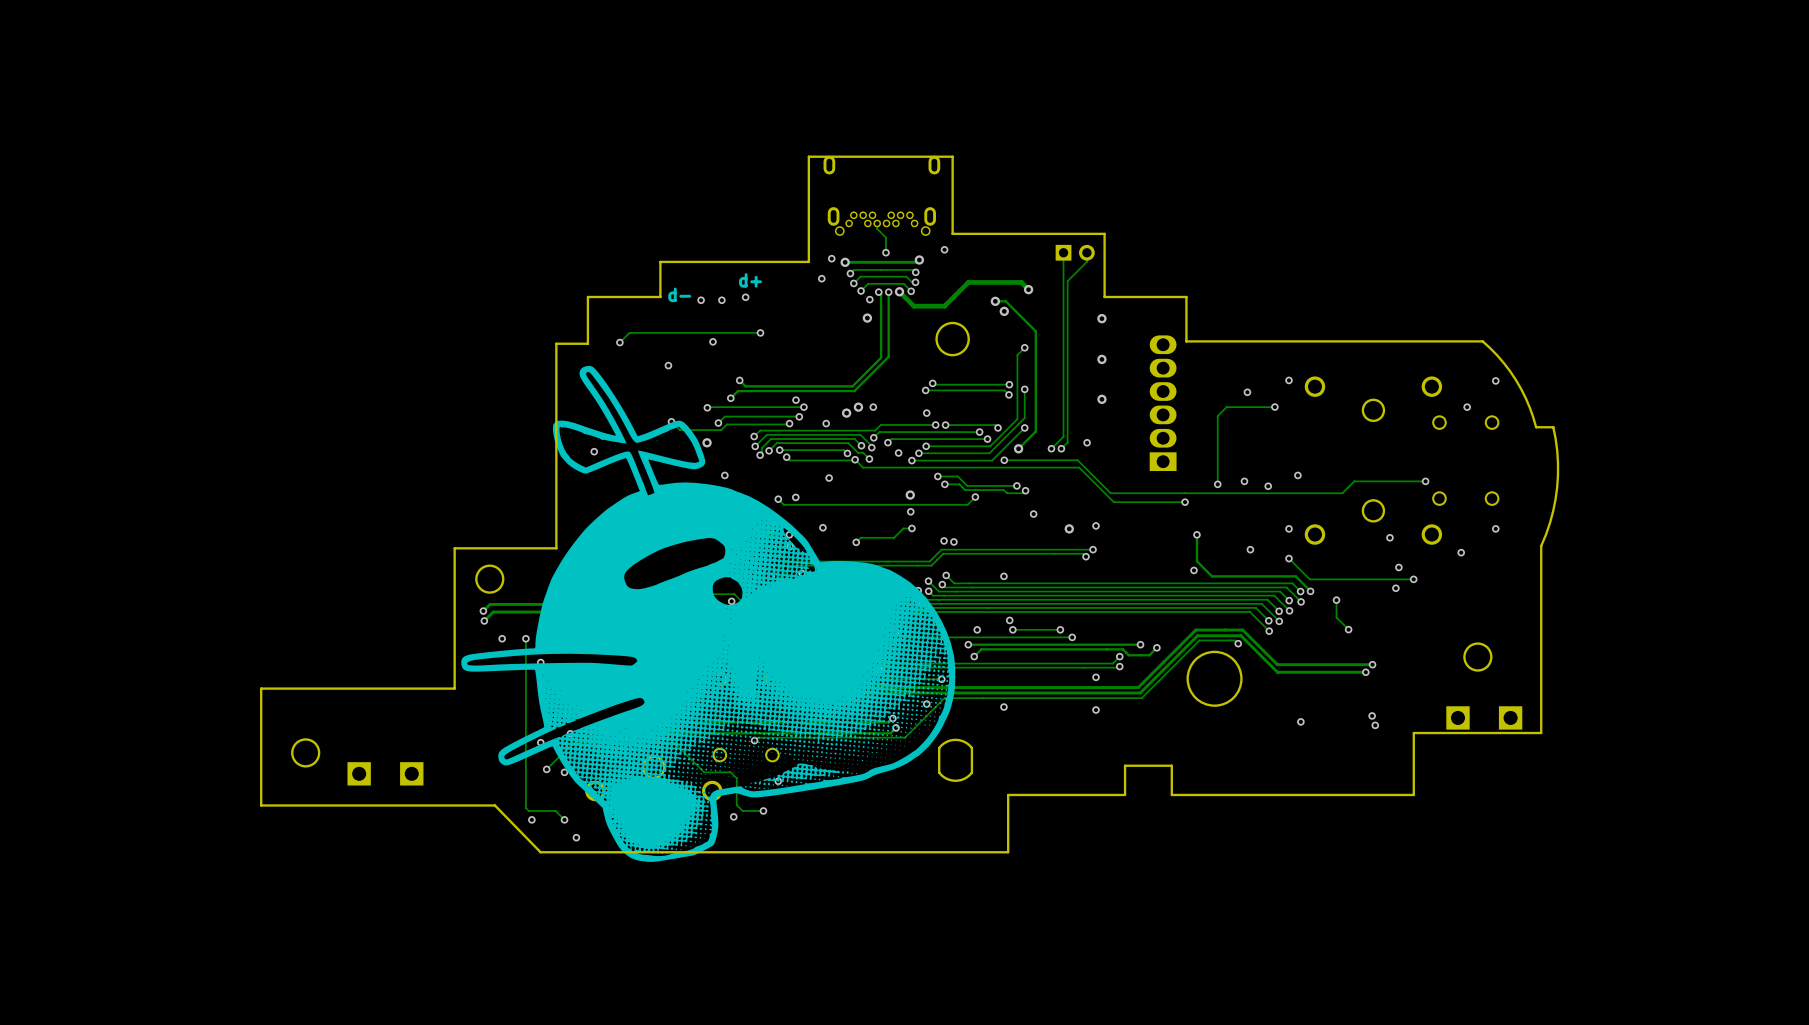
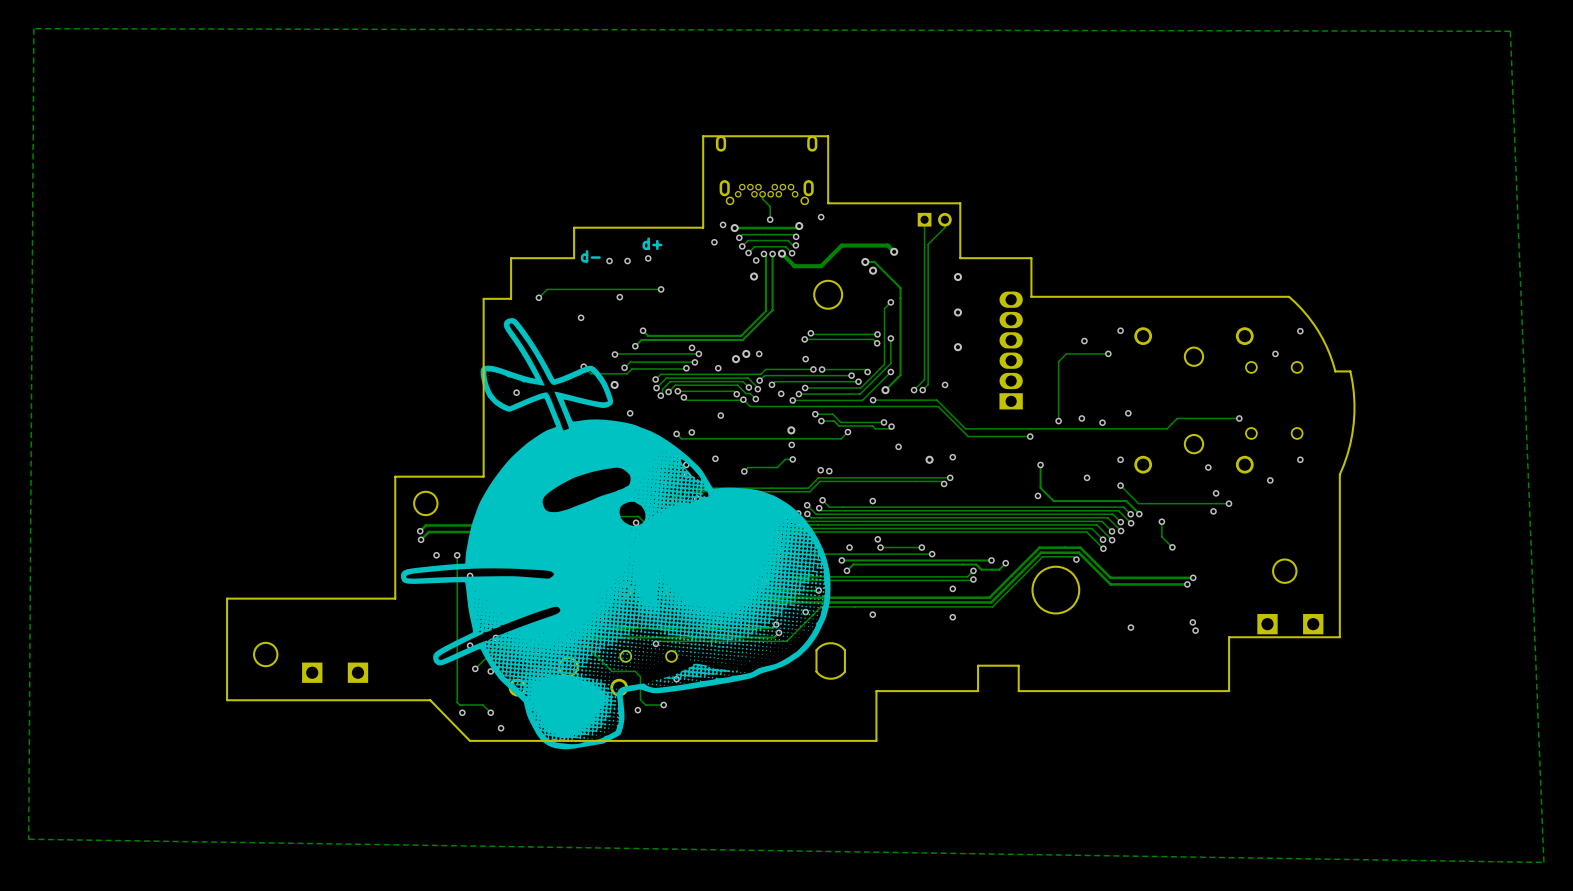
zone outline: none -> (33, 28) (1510, 31) (1543, 862) (28, 839) (33, 28)

